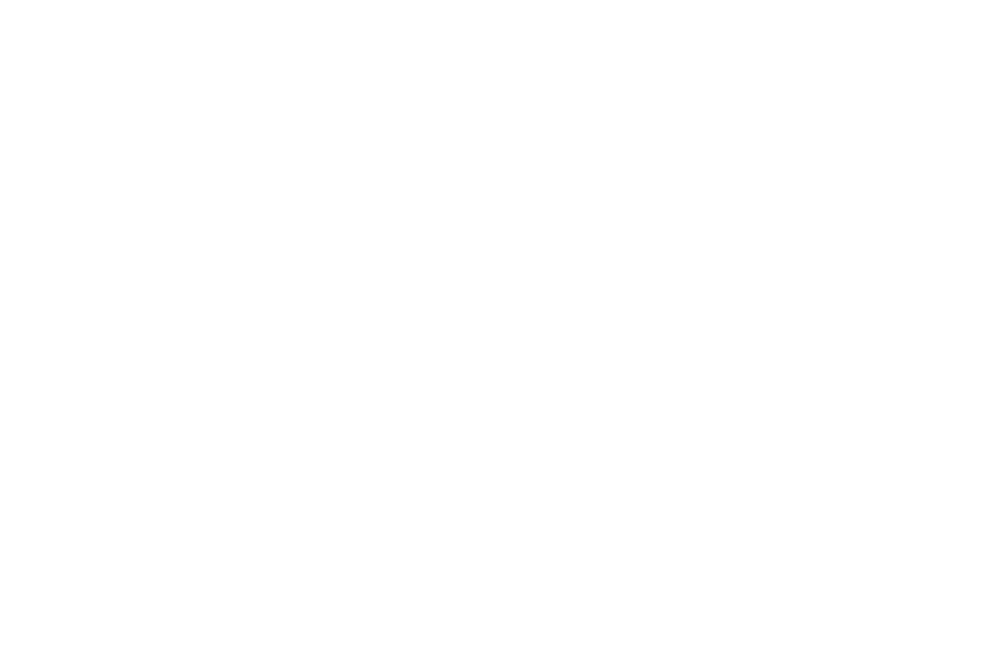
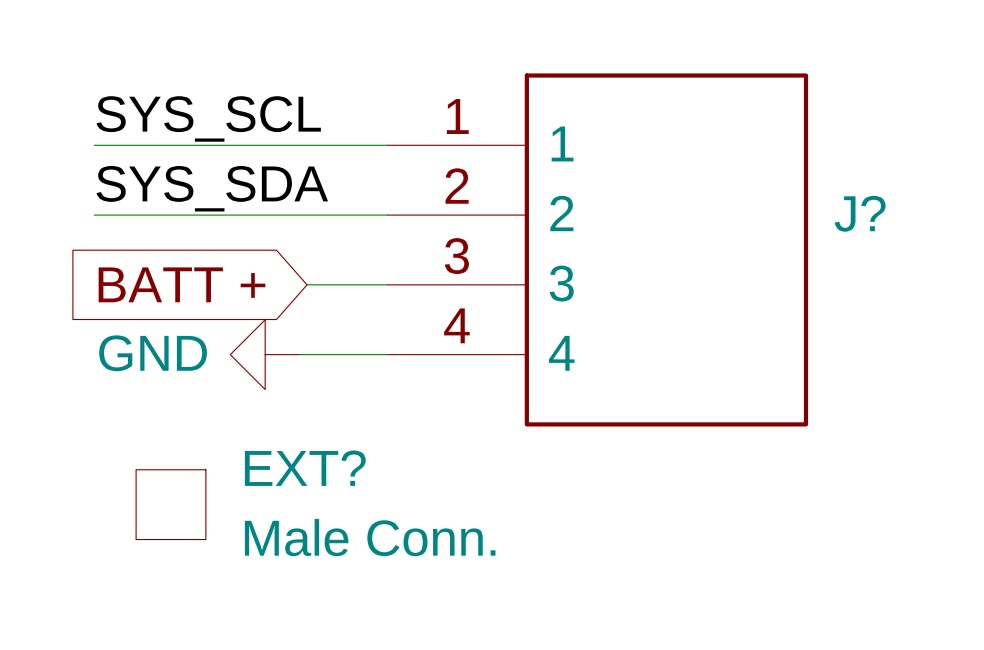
label: none -> SYS_SCL (208, 118)
wire: none -> (94, 145) (387, 145)
label: none -> SYS_SDA (212, 188)
wire: none -> (94, 215) (387, 215)
J?: none -> (597, 249)
global label: none -> BATT + (181, 284)
wire: none -> (307, 284) (387, 284)
power symbol: none -> GND (265, 354)
wire: none -> (300, 354) (387, 354)
EXT?: none -> Male Conn. (170, 504)

